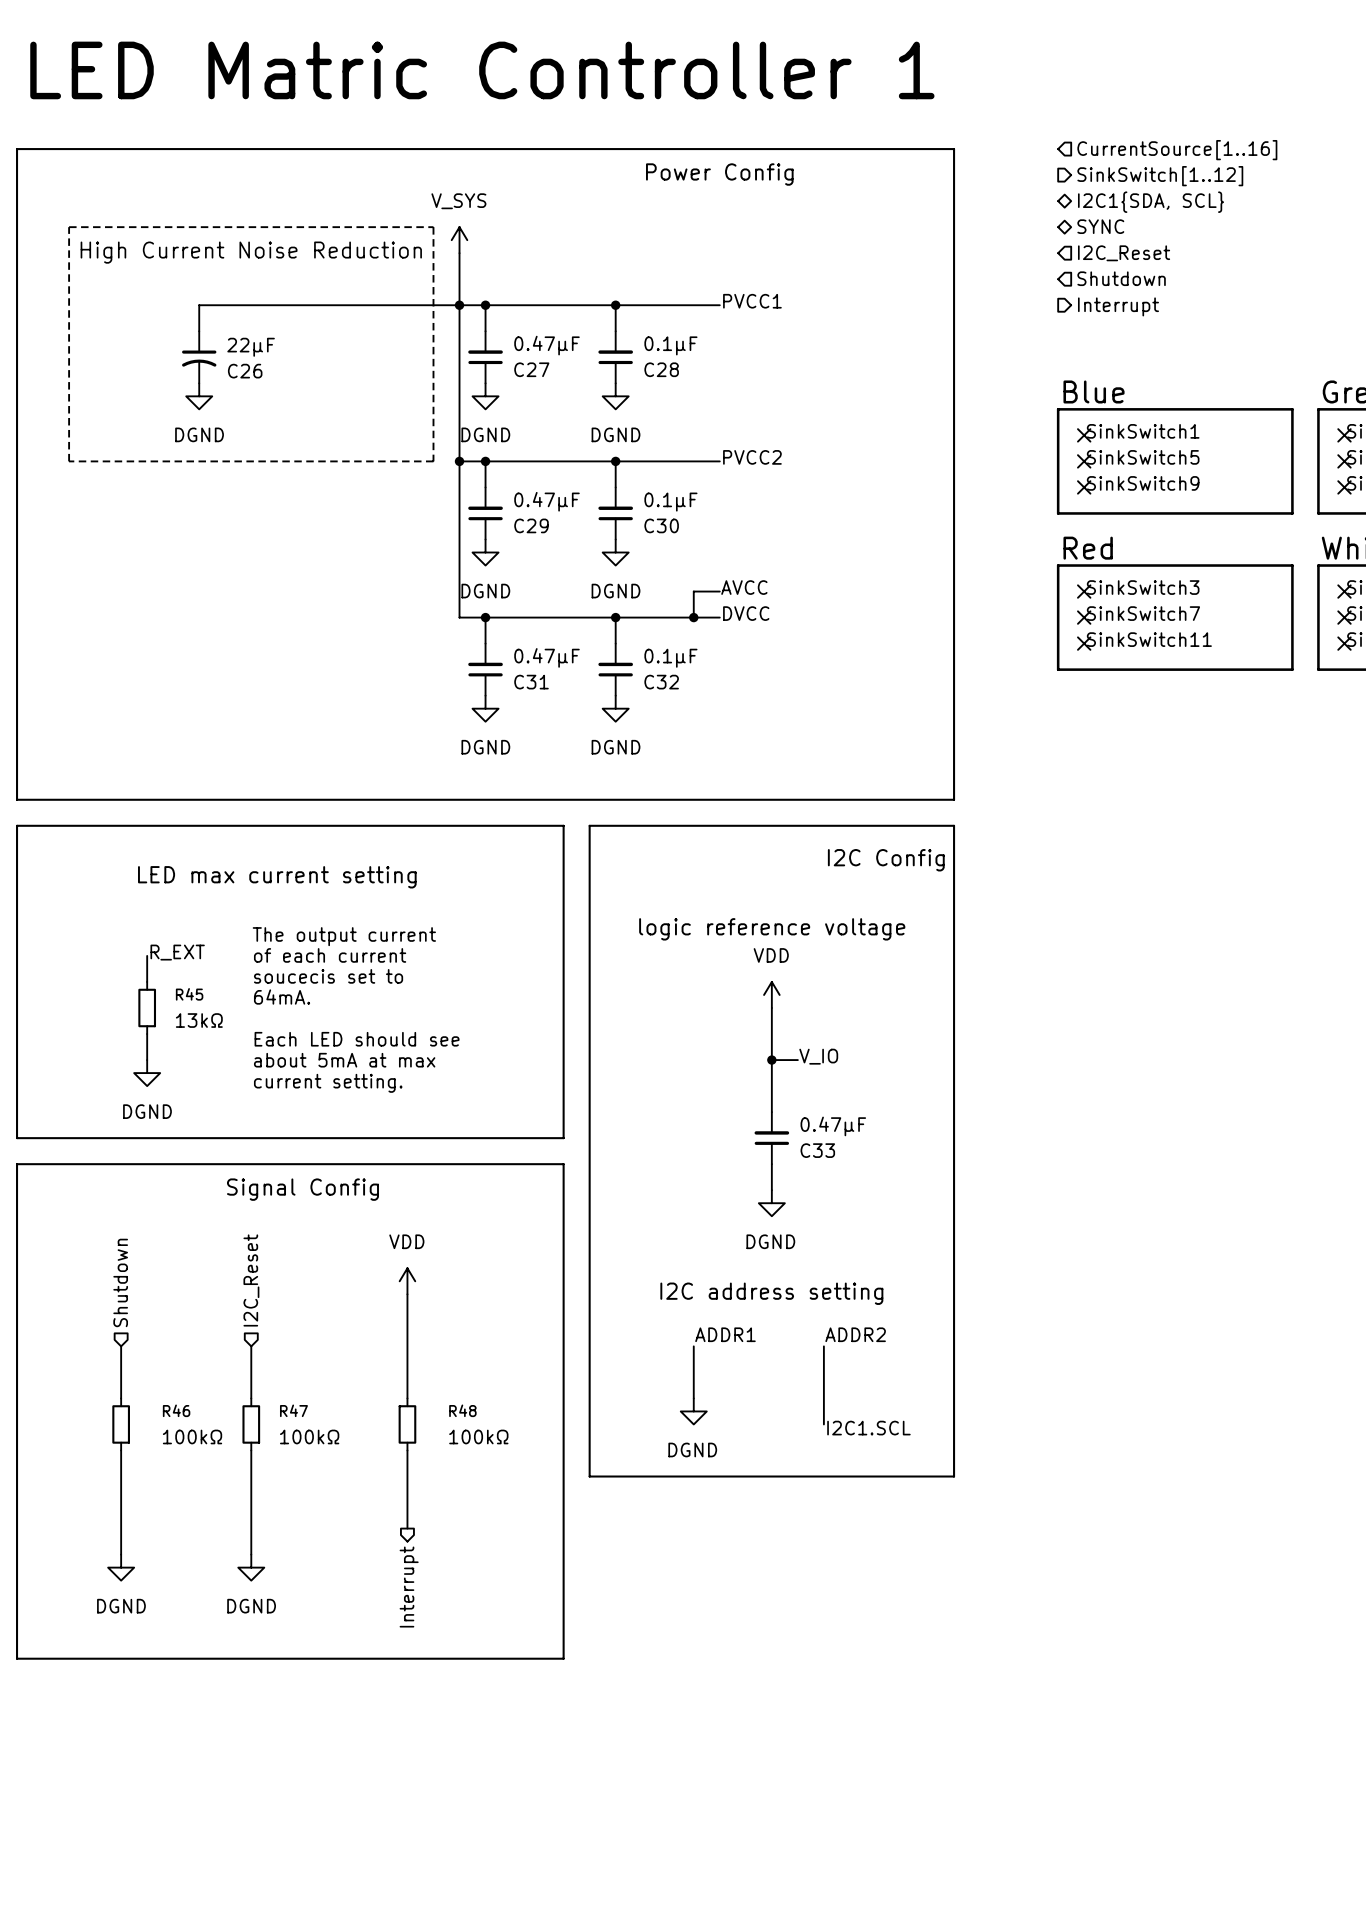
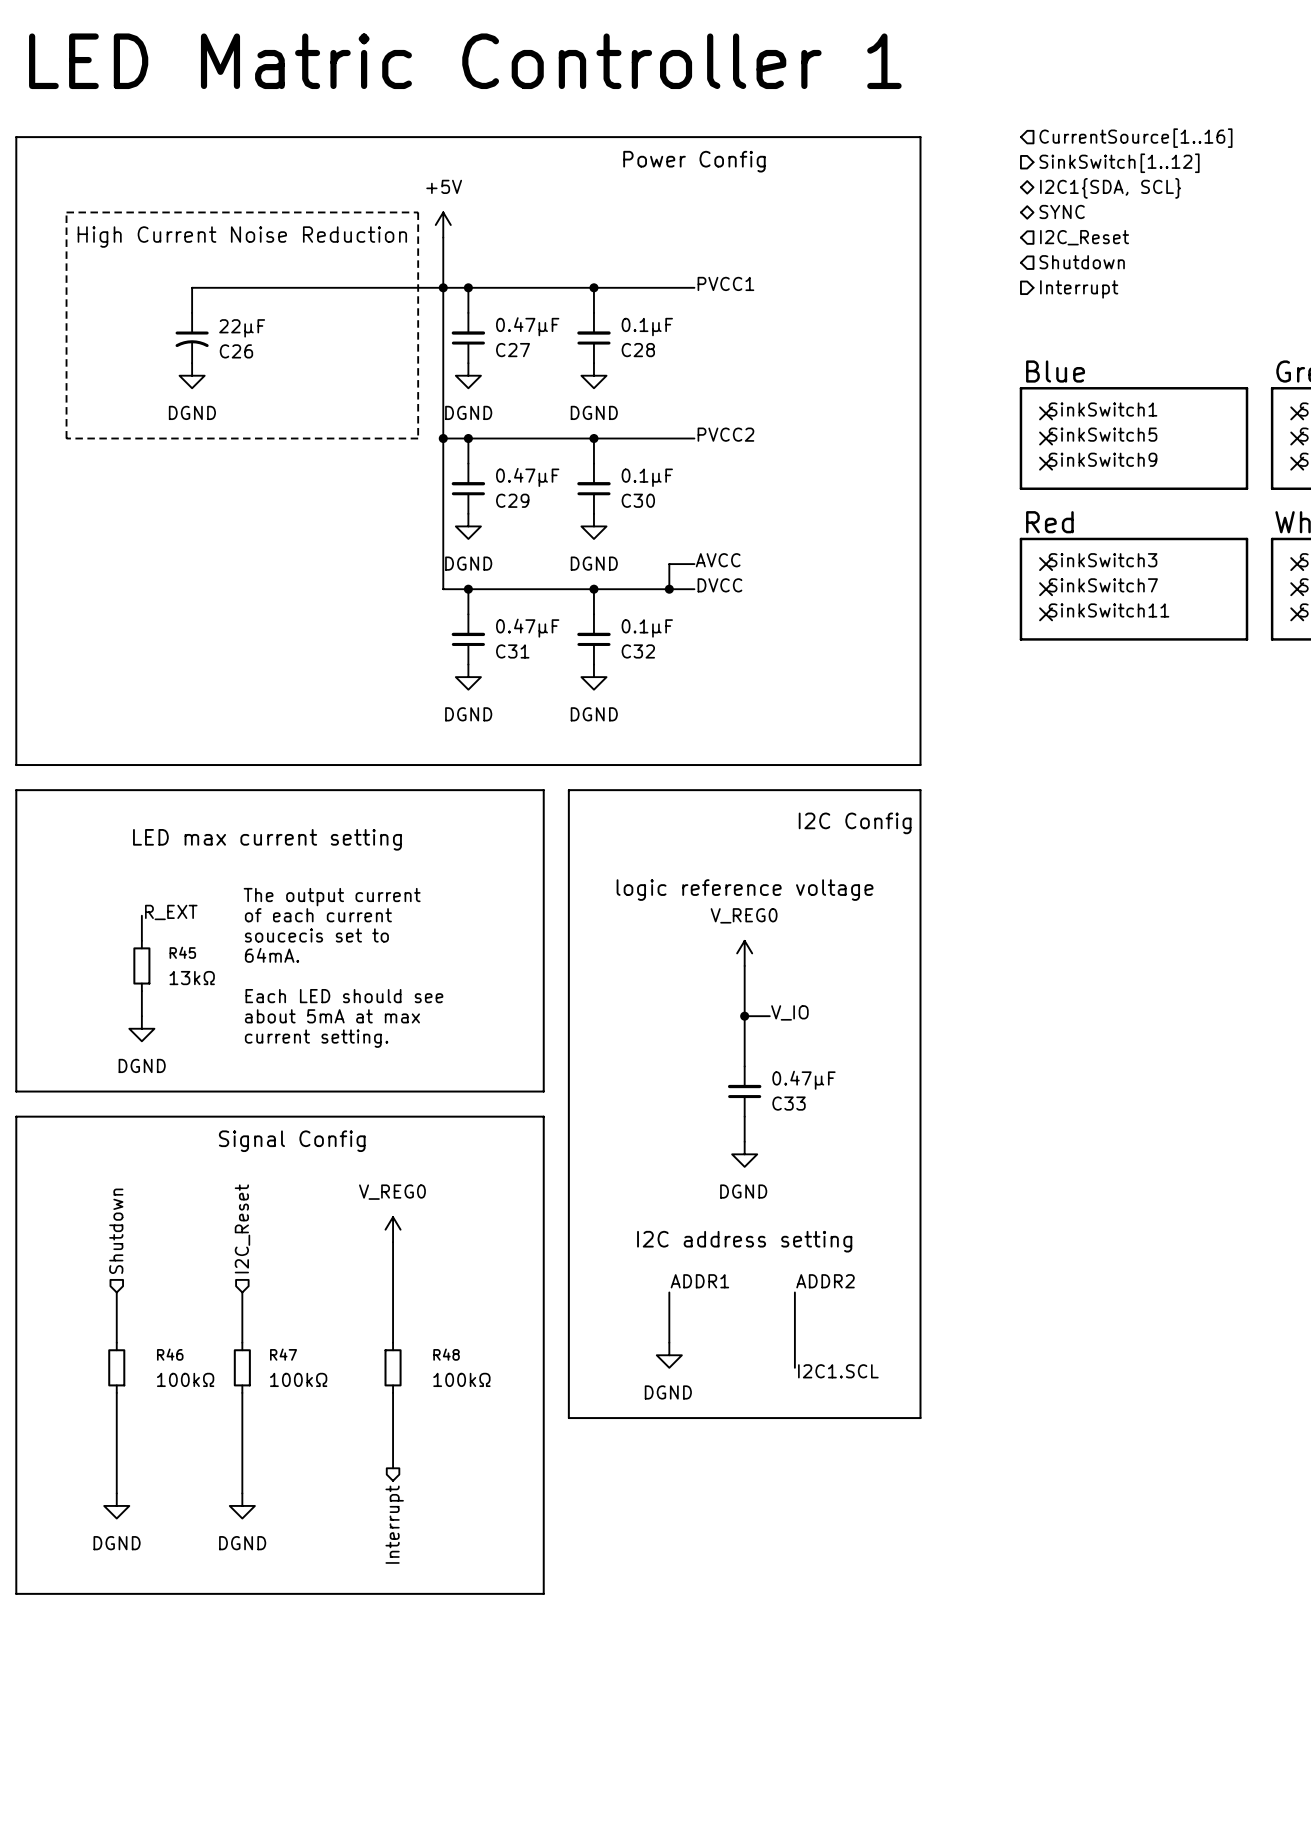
power symbol: V_SYS (459, 240) -> +5V (443, 225)
power symbol: VDD (771, 994) -> V_REG0 (744, 953)
power symbol: VDD (407, 1281) -> V_REG0 (393, 1229)

